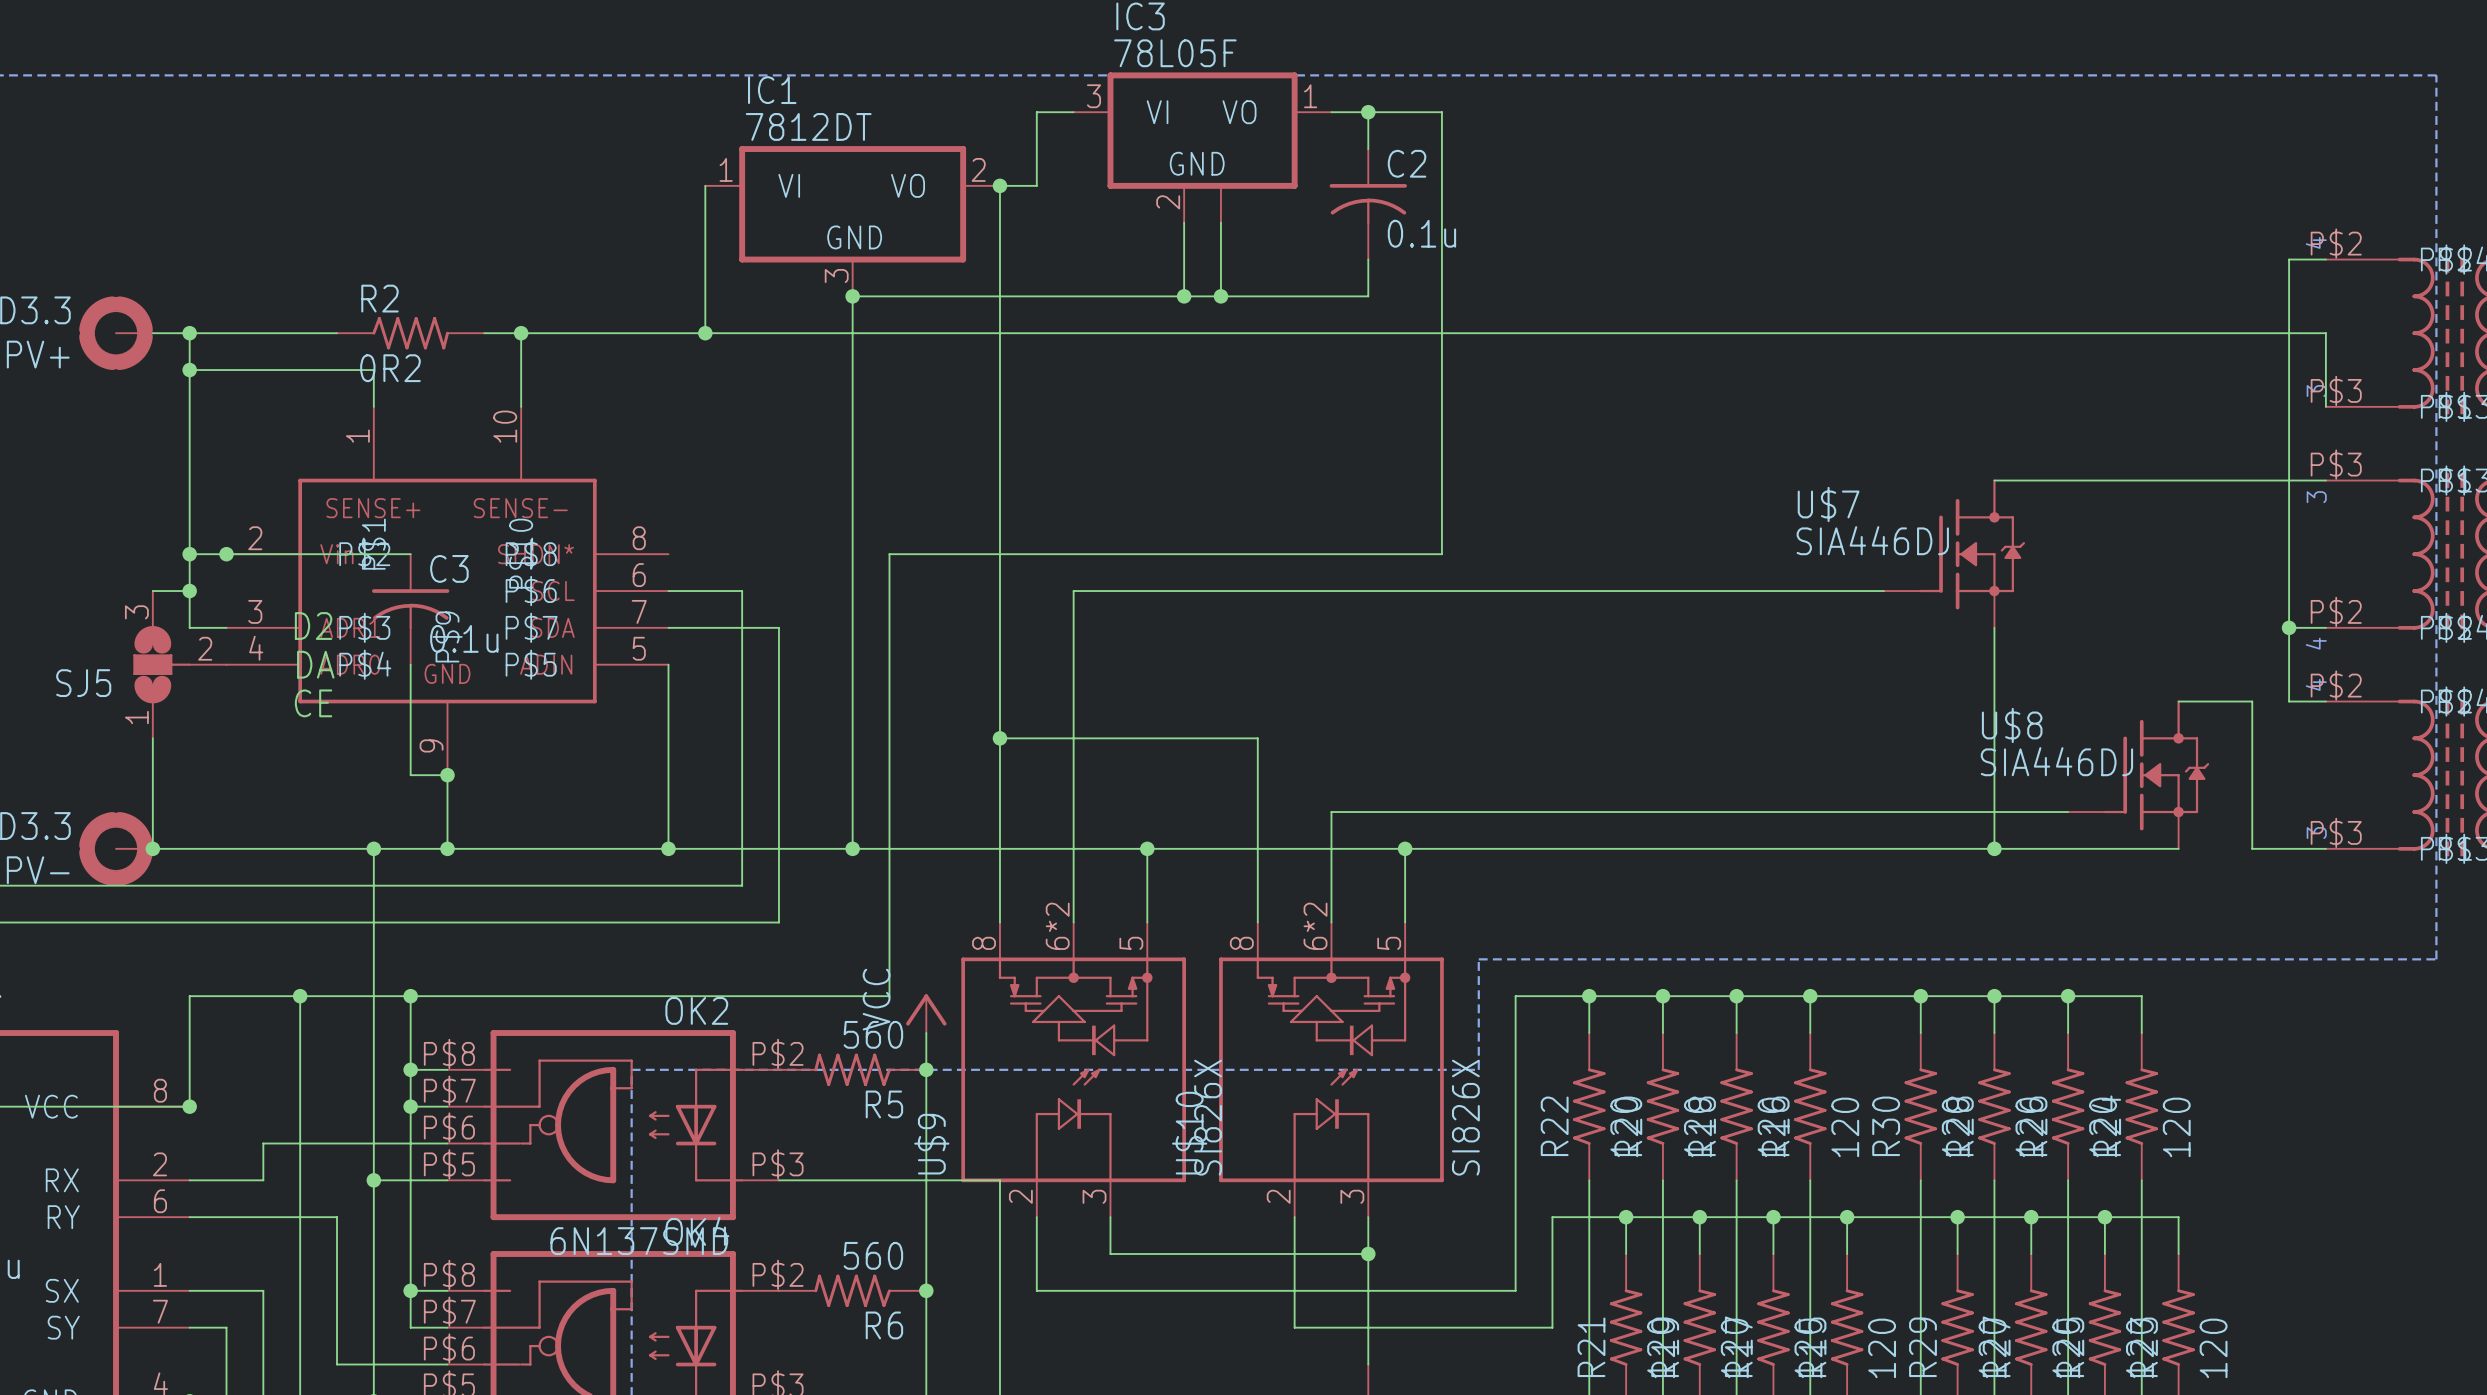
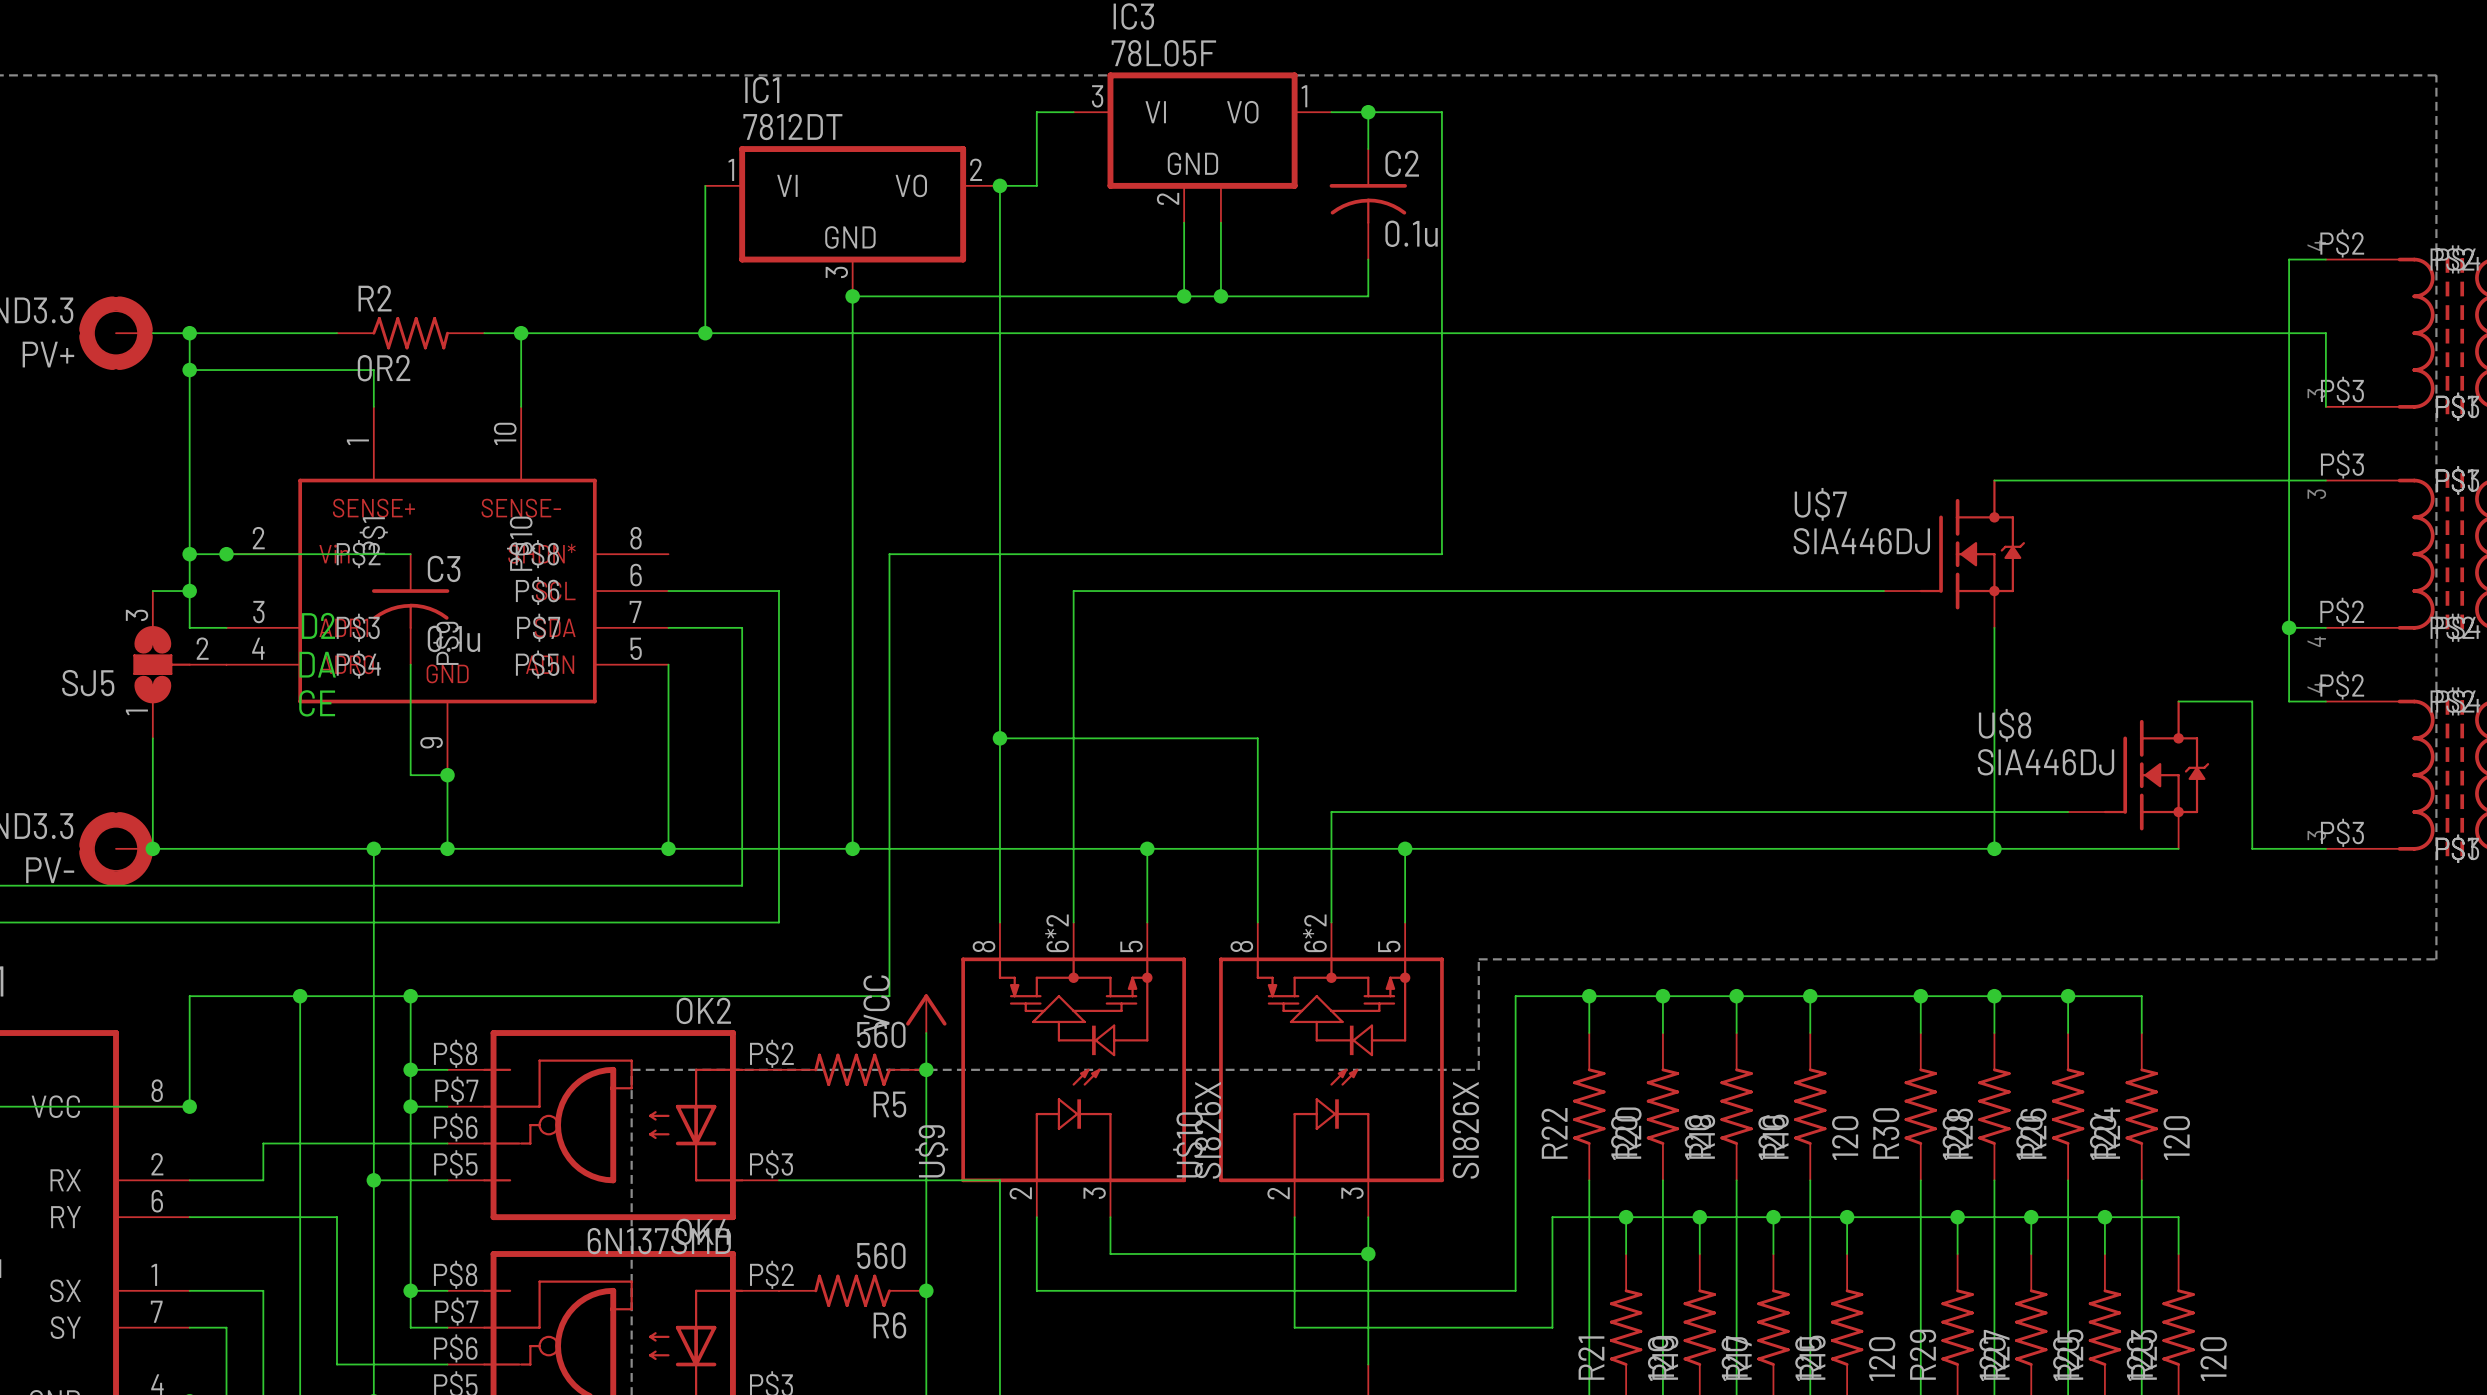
wire: (742, 591) (742, 627) (778, 627) -> (742, 591) (778, 591) (778, 627)

